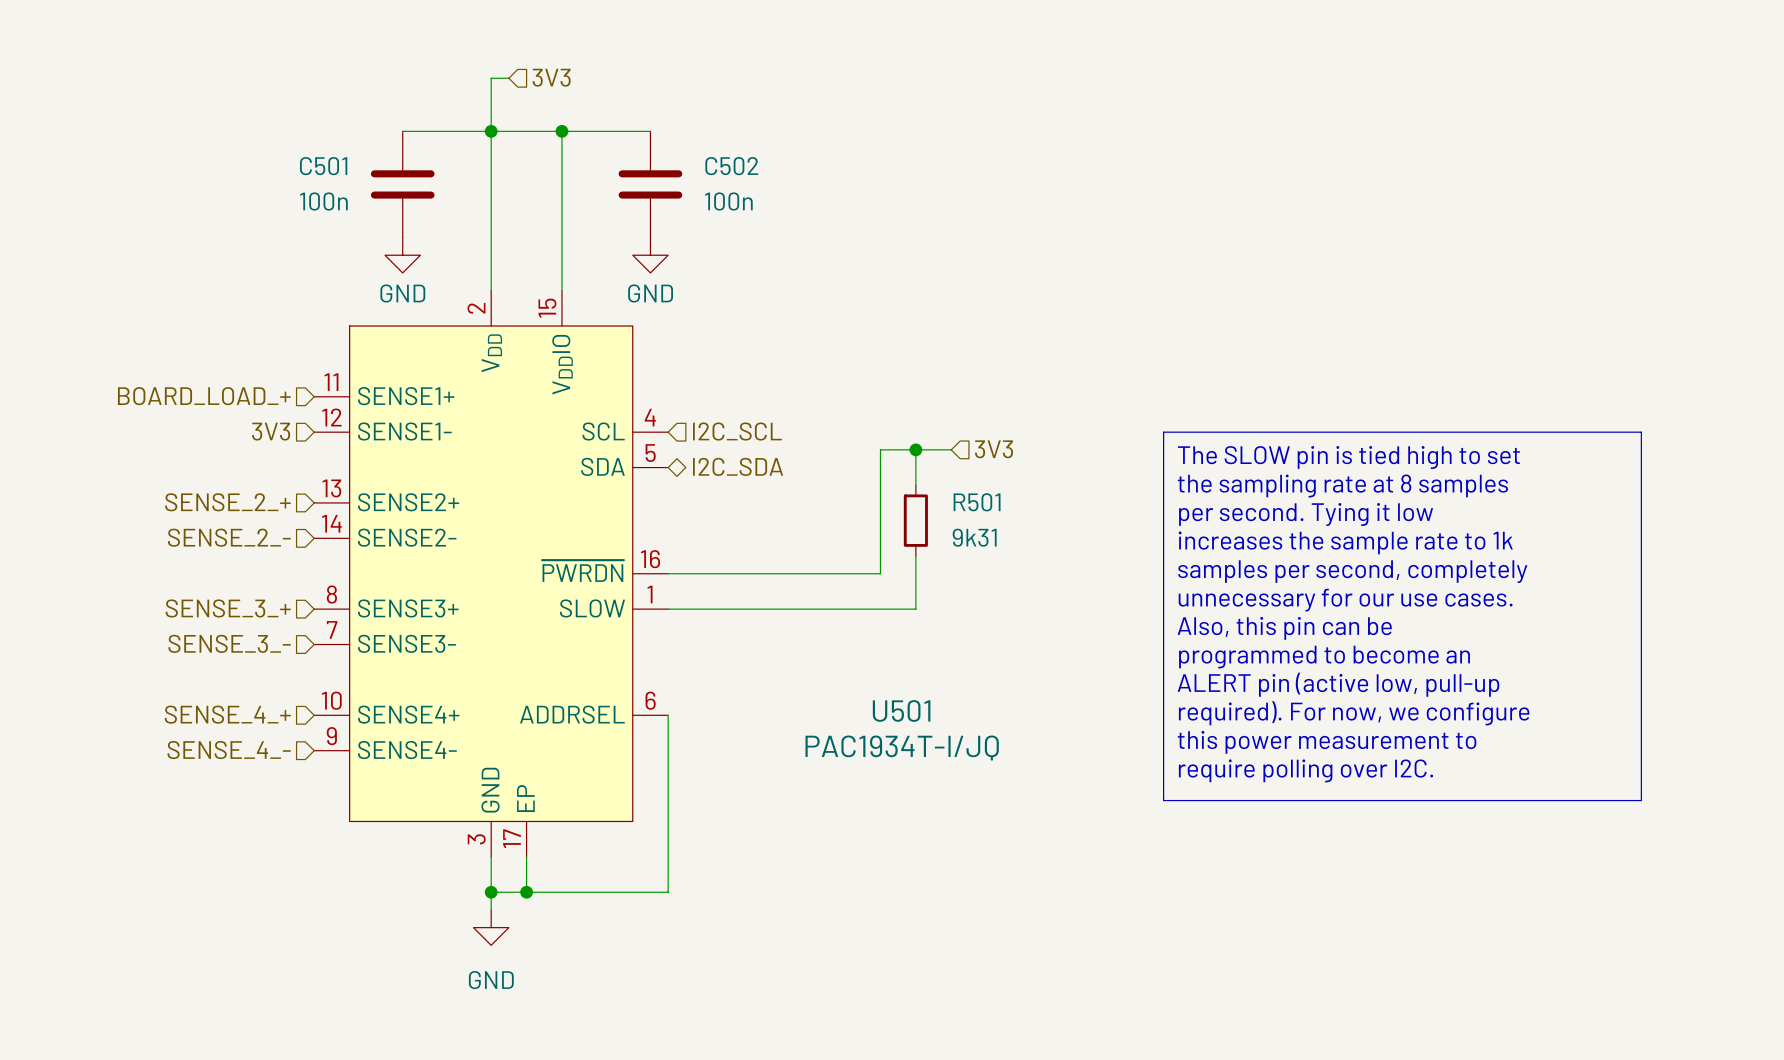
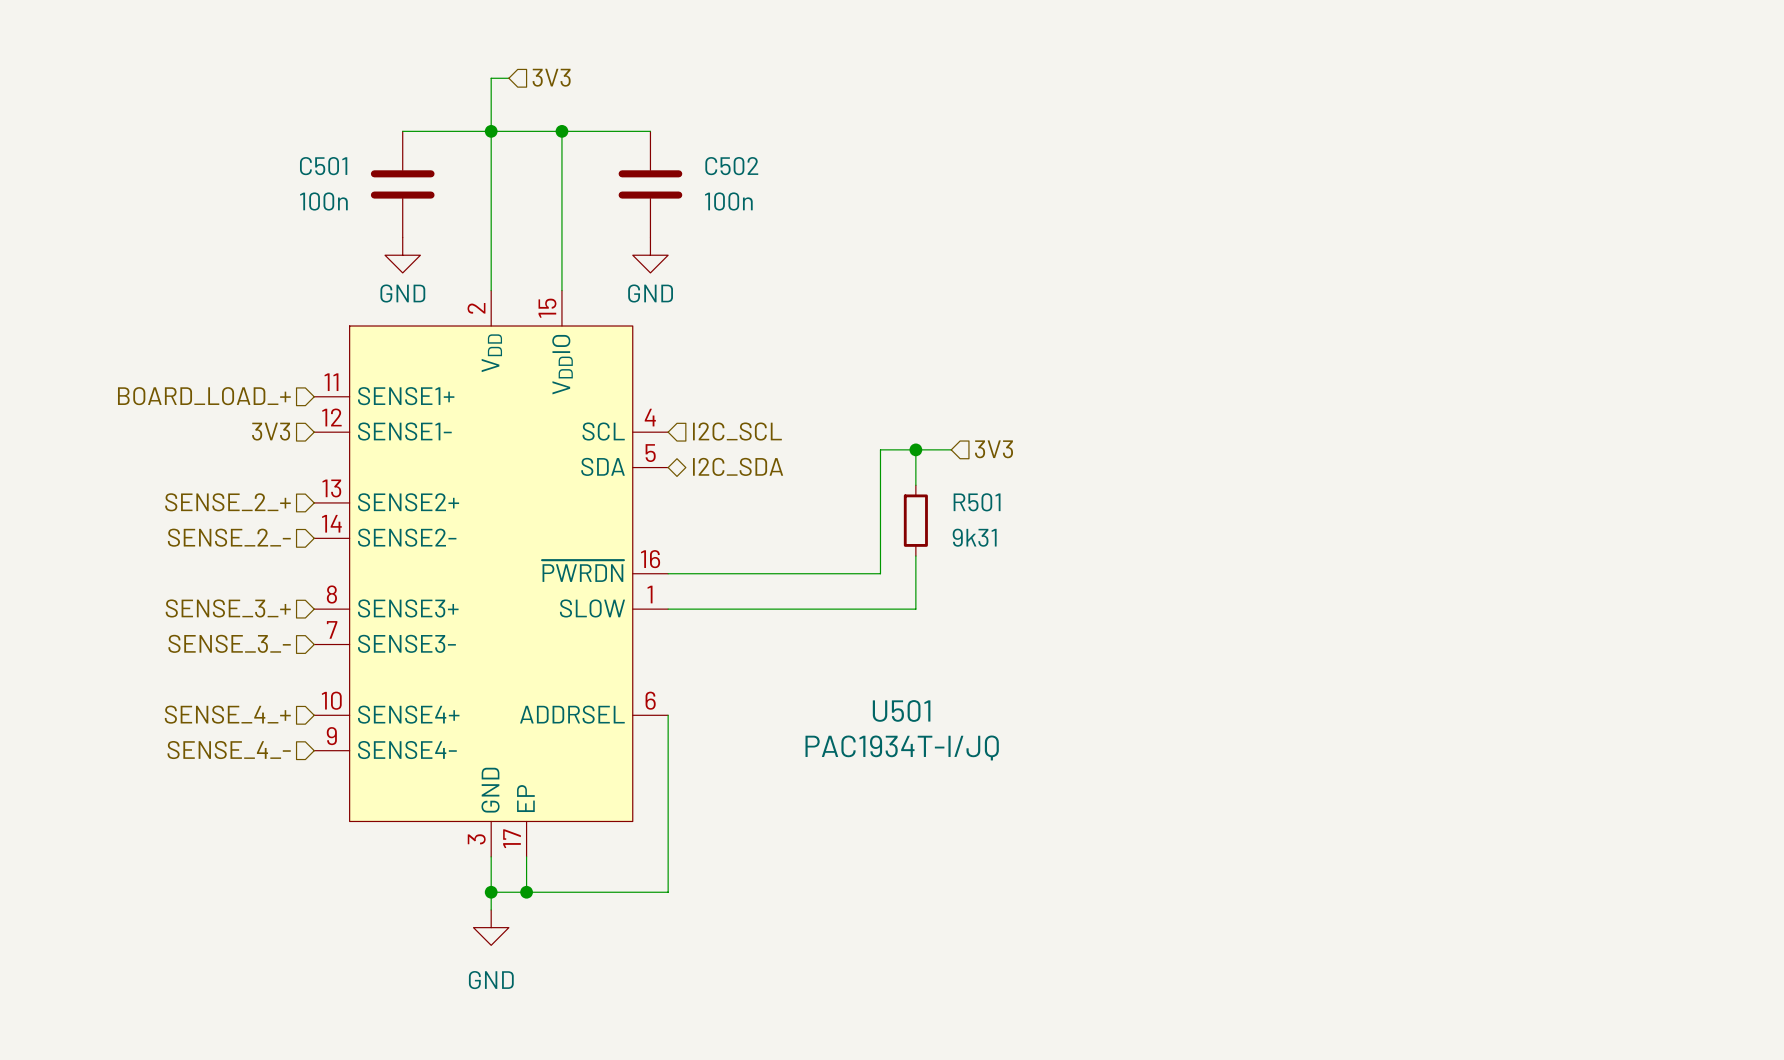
line: (1163, 432) (1641, 432) (1641, 800) (1163, 800) (1163, 432) -> none
text: The SLOW pin is tied high to set (1348, 457) -> none
text: the sampling rate at 8 samples (1342, 486) -> none
text: per second. Tying it low (1306, 514) -> none
text: increases the sample rate to 1k (1345, 542) -> none
text: samples per second, completely (1352, 571) -> none
text: unnecessary for our use cases. (1345, 600) -> none
text: Also, this pin can be (1284, 628) -> none
text: programmed to become an (1324, 657) -> none
text: ALERT pin (active low, pull-up (1338, 684) -> none
text: required). For now, we configure (1354, 713) -> none
text: this power measurement to (1327, 742) -> none
text: require polling over I2C. (1305, 770) -> none

